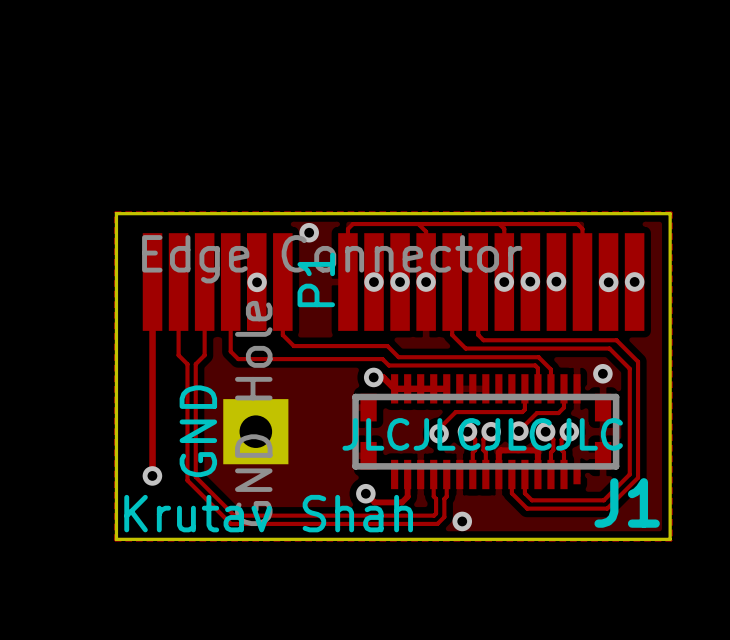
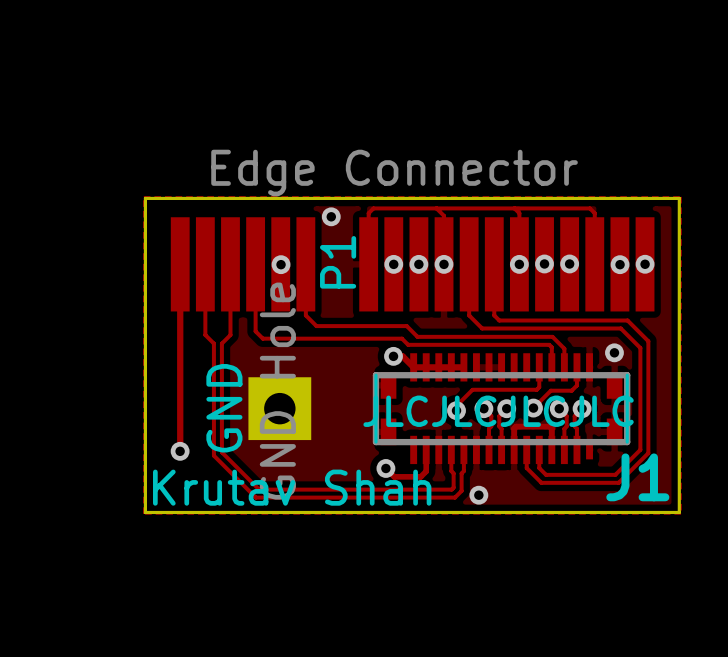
P1 value position: Edge Connector (332, 259) -> Edge Connector (394, 173)
J1 footprint: [352, 374, 620, 490] -> [372, 353, 631, 465]

